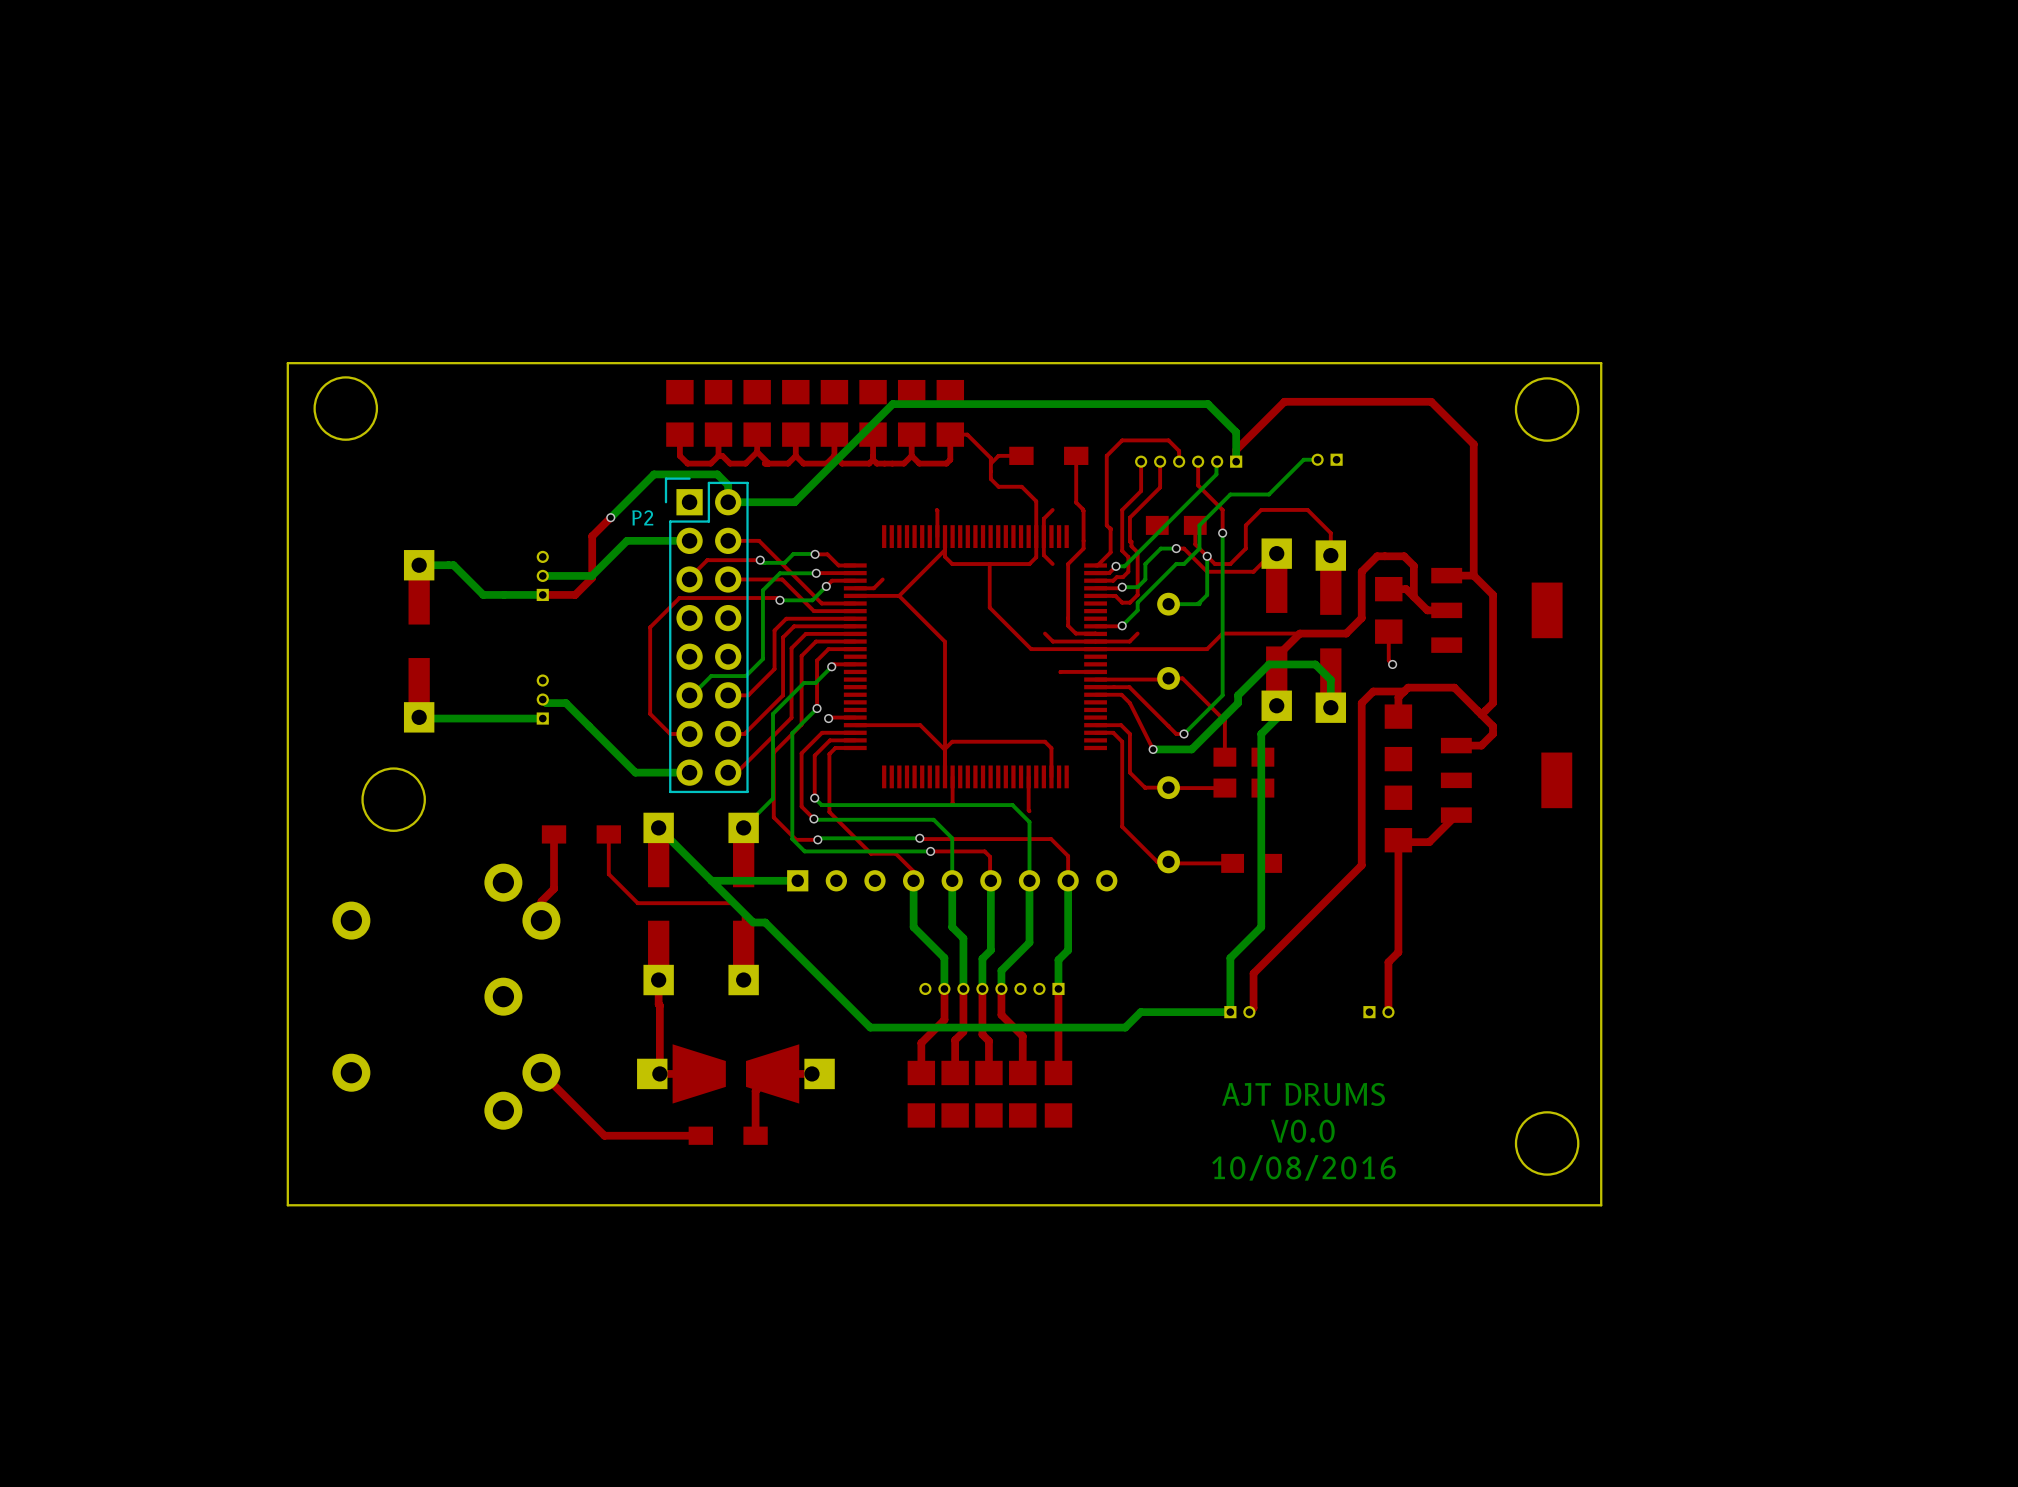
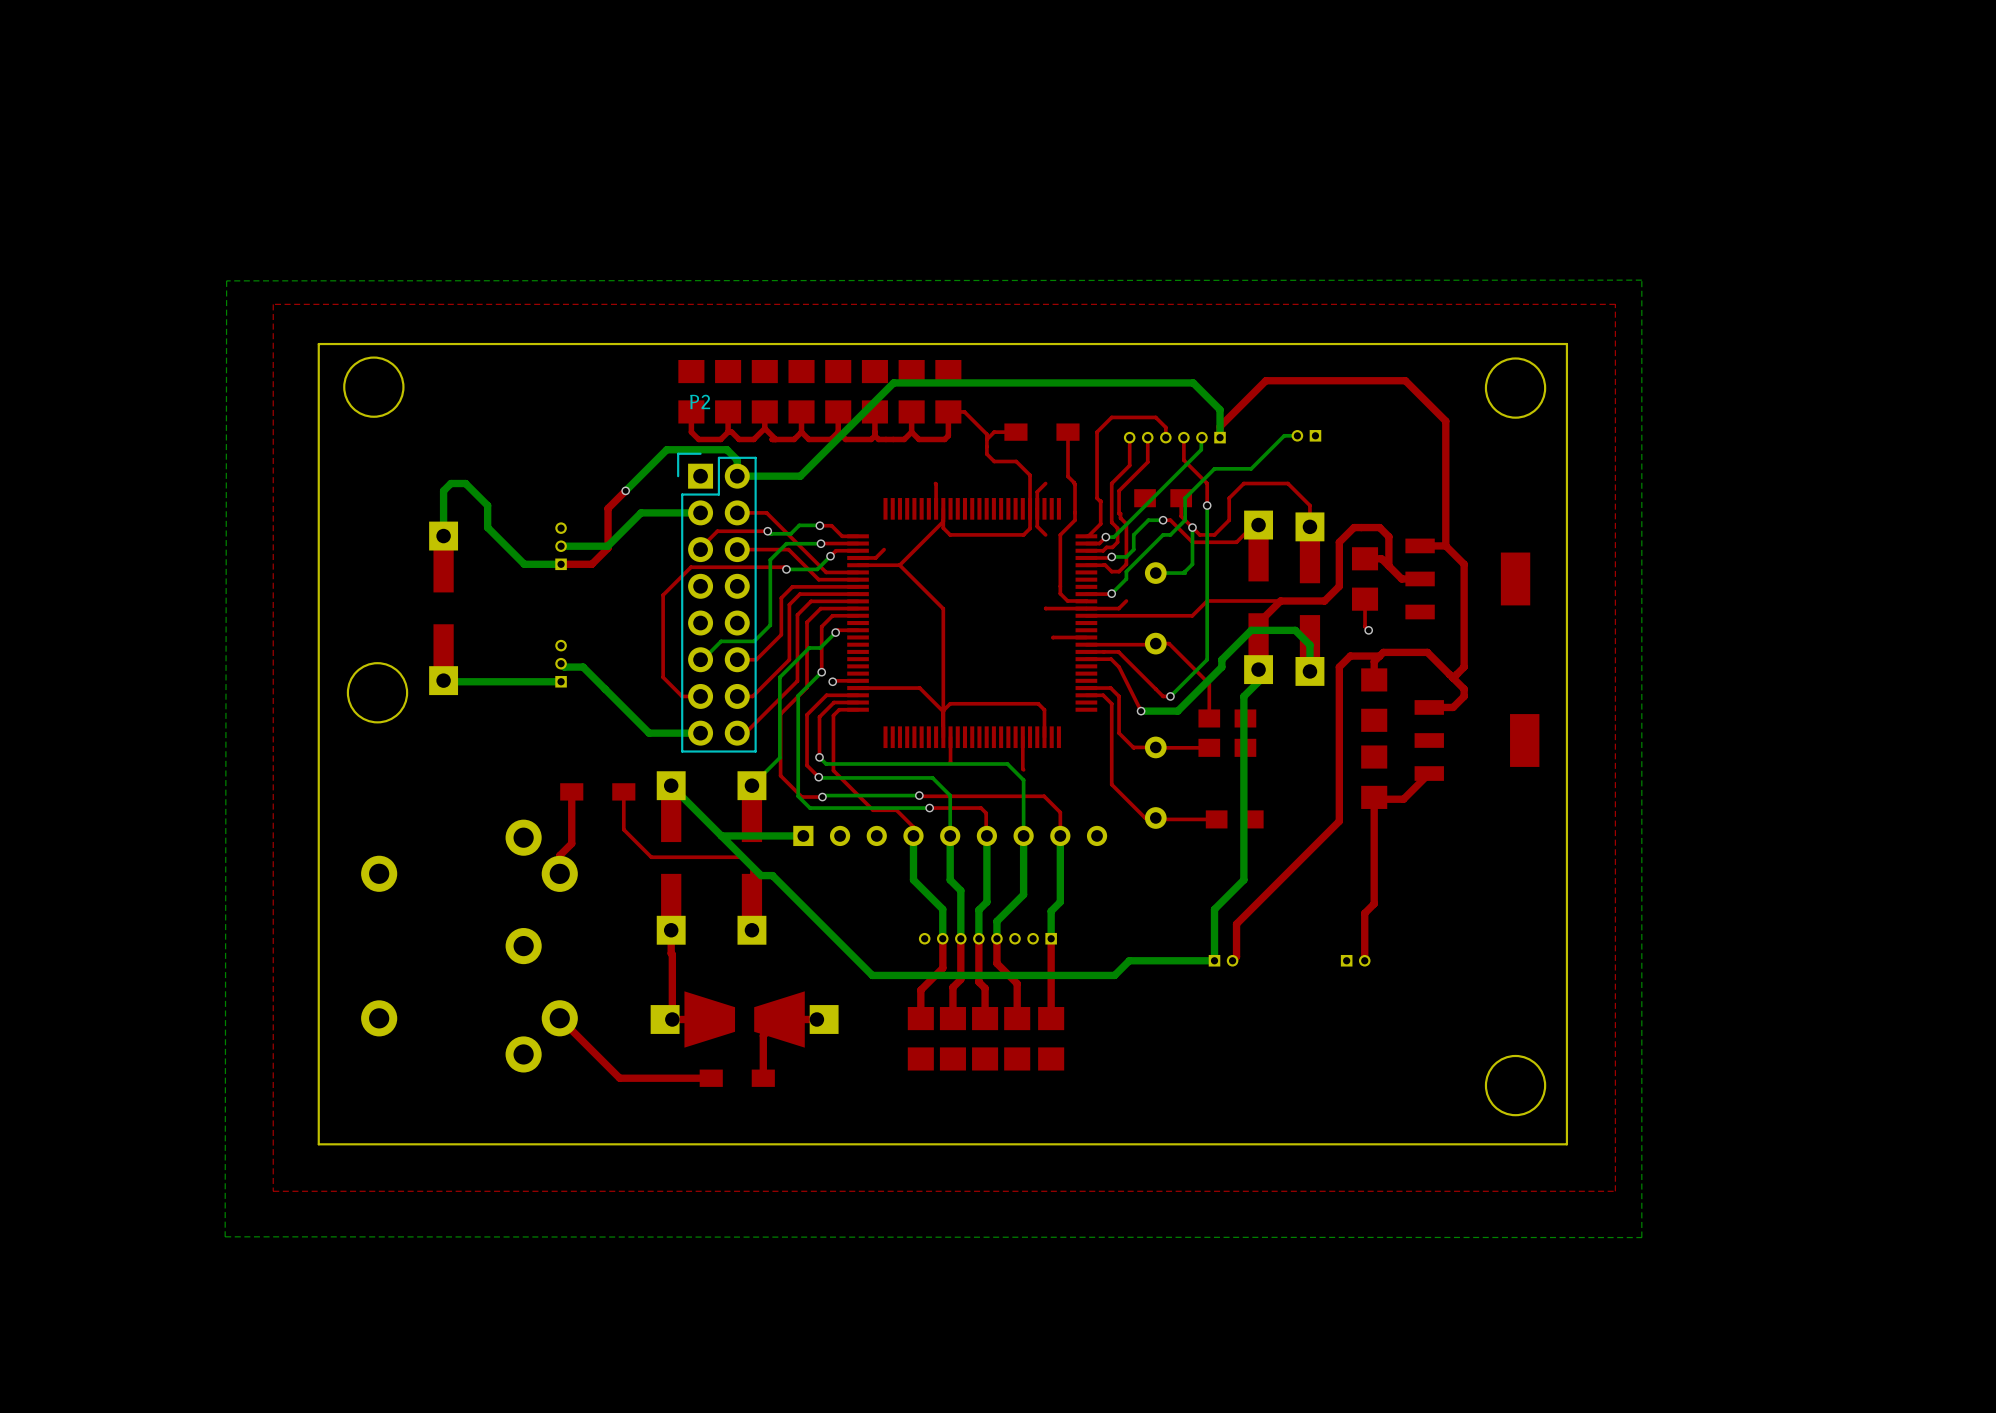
bottom zone outline: none -> (1641, 280) (226, 280) (225, 1236) (1641, 1237) (1641, 280)
top zone outline: none -> (1615, 304) (1615, 1191) (273, 1191) (273, 304) (1615, 304)
P2 name position: P2 (642, 517) -> P2 (700, 401)
top track: (989, 564) (989, 607) (1031, 649) (1095, 649) -> none
bottom track: (419, 565) (453, 565) (483, 594) (504, 594) -> (443, 528) (443, 490) (450, 483) (465, 483) (487, 505) (487, 527) (524, 564)
top track: (1044, 633) (1052, 641) -> none
round board edge position: (393, 799) -> (377, 692)
text: AJT DRUMS (1303, 1094) -> none
text: V0.0 (1302, 1131) -> none
text: 10/08/2016 (1303, 1167) -> none

